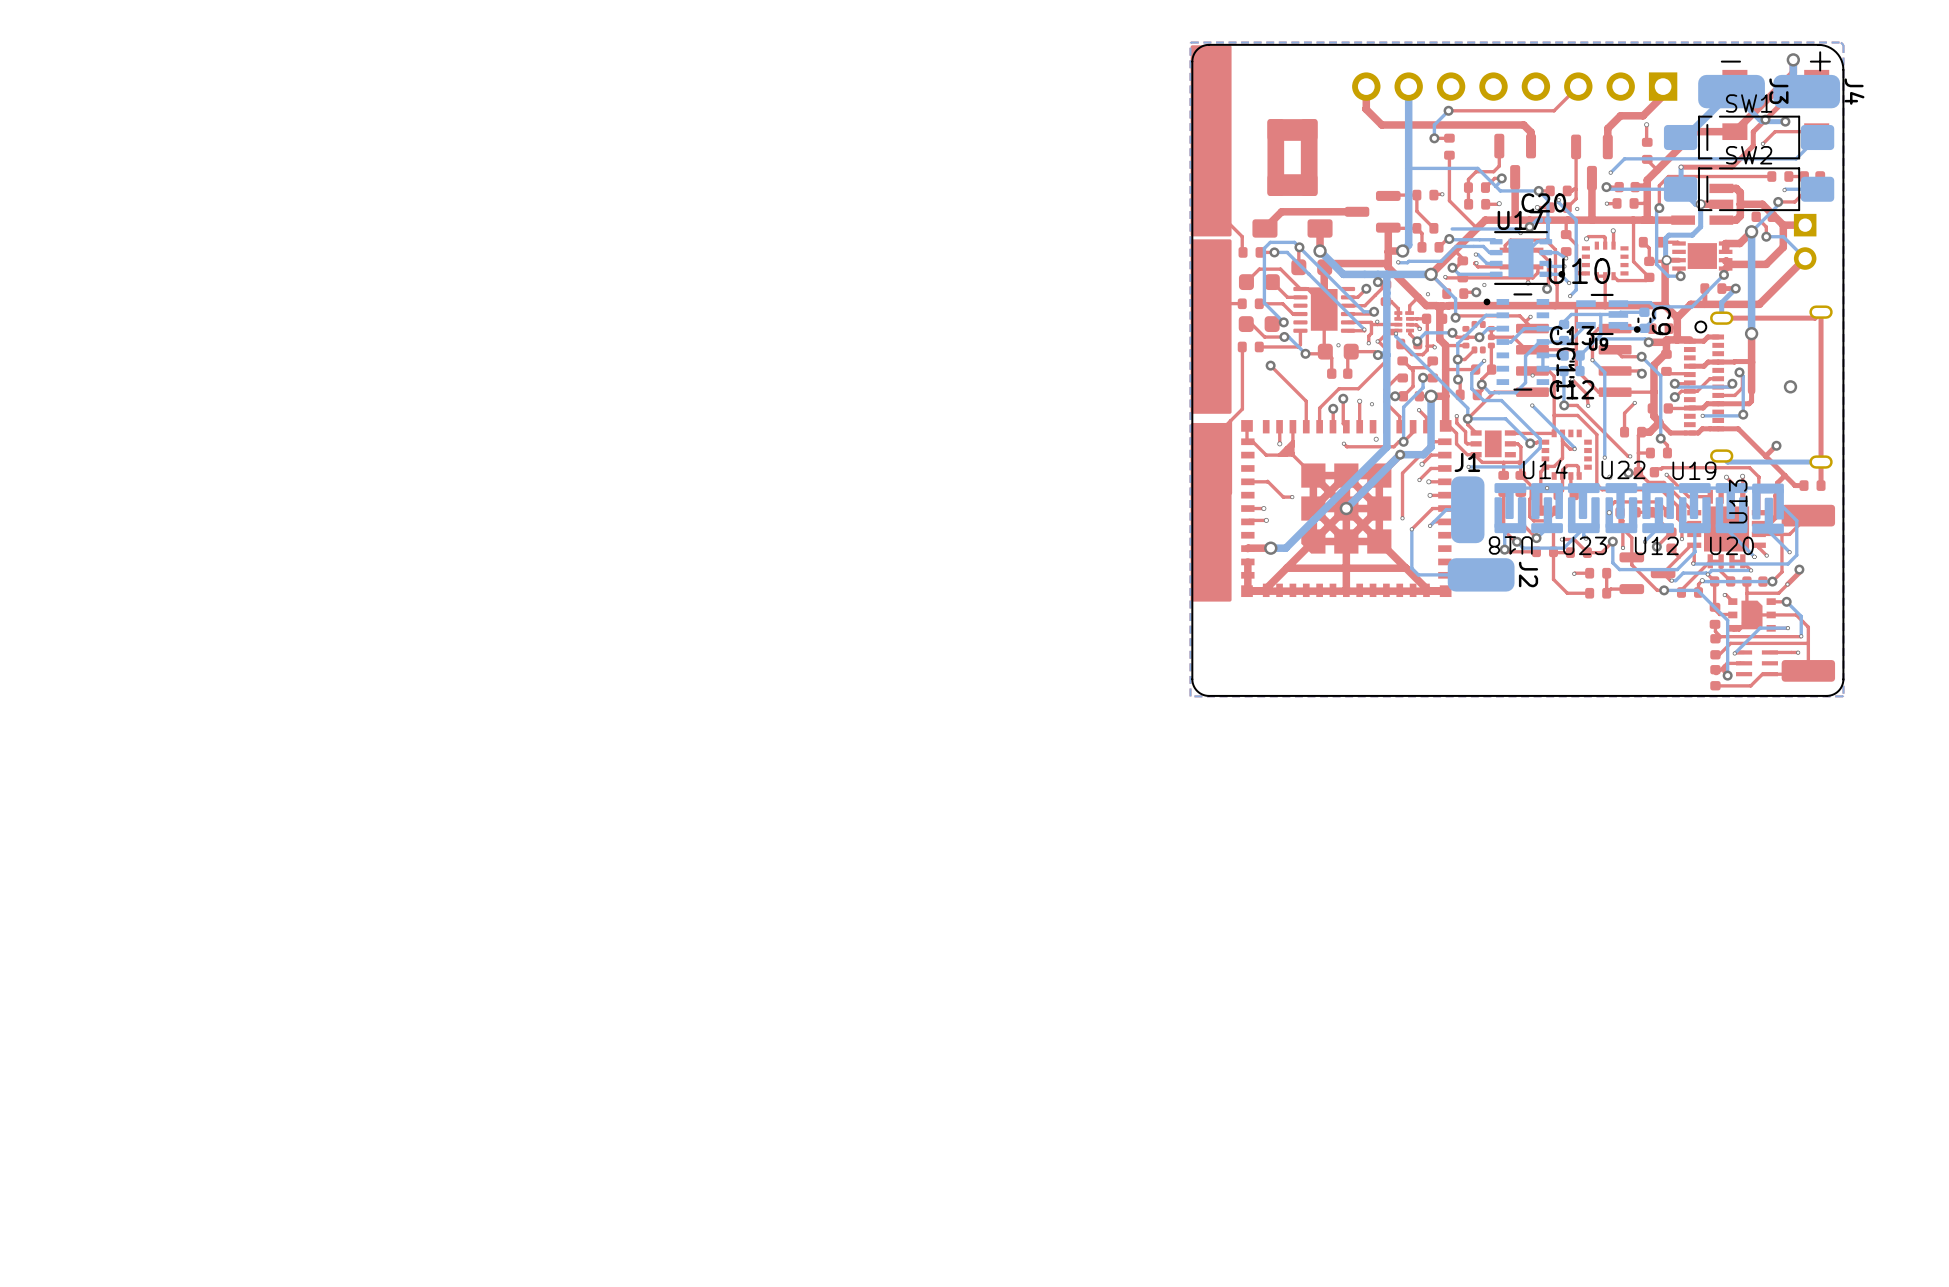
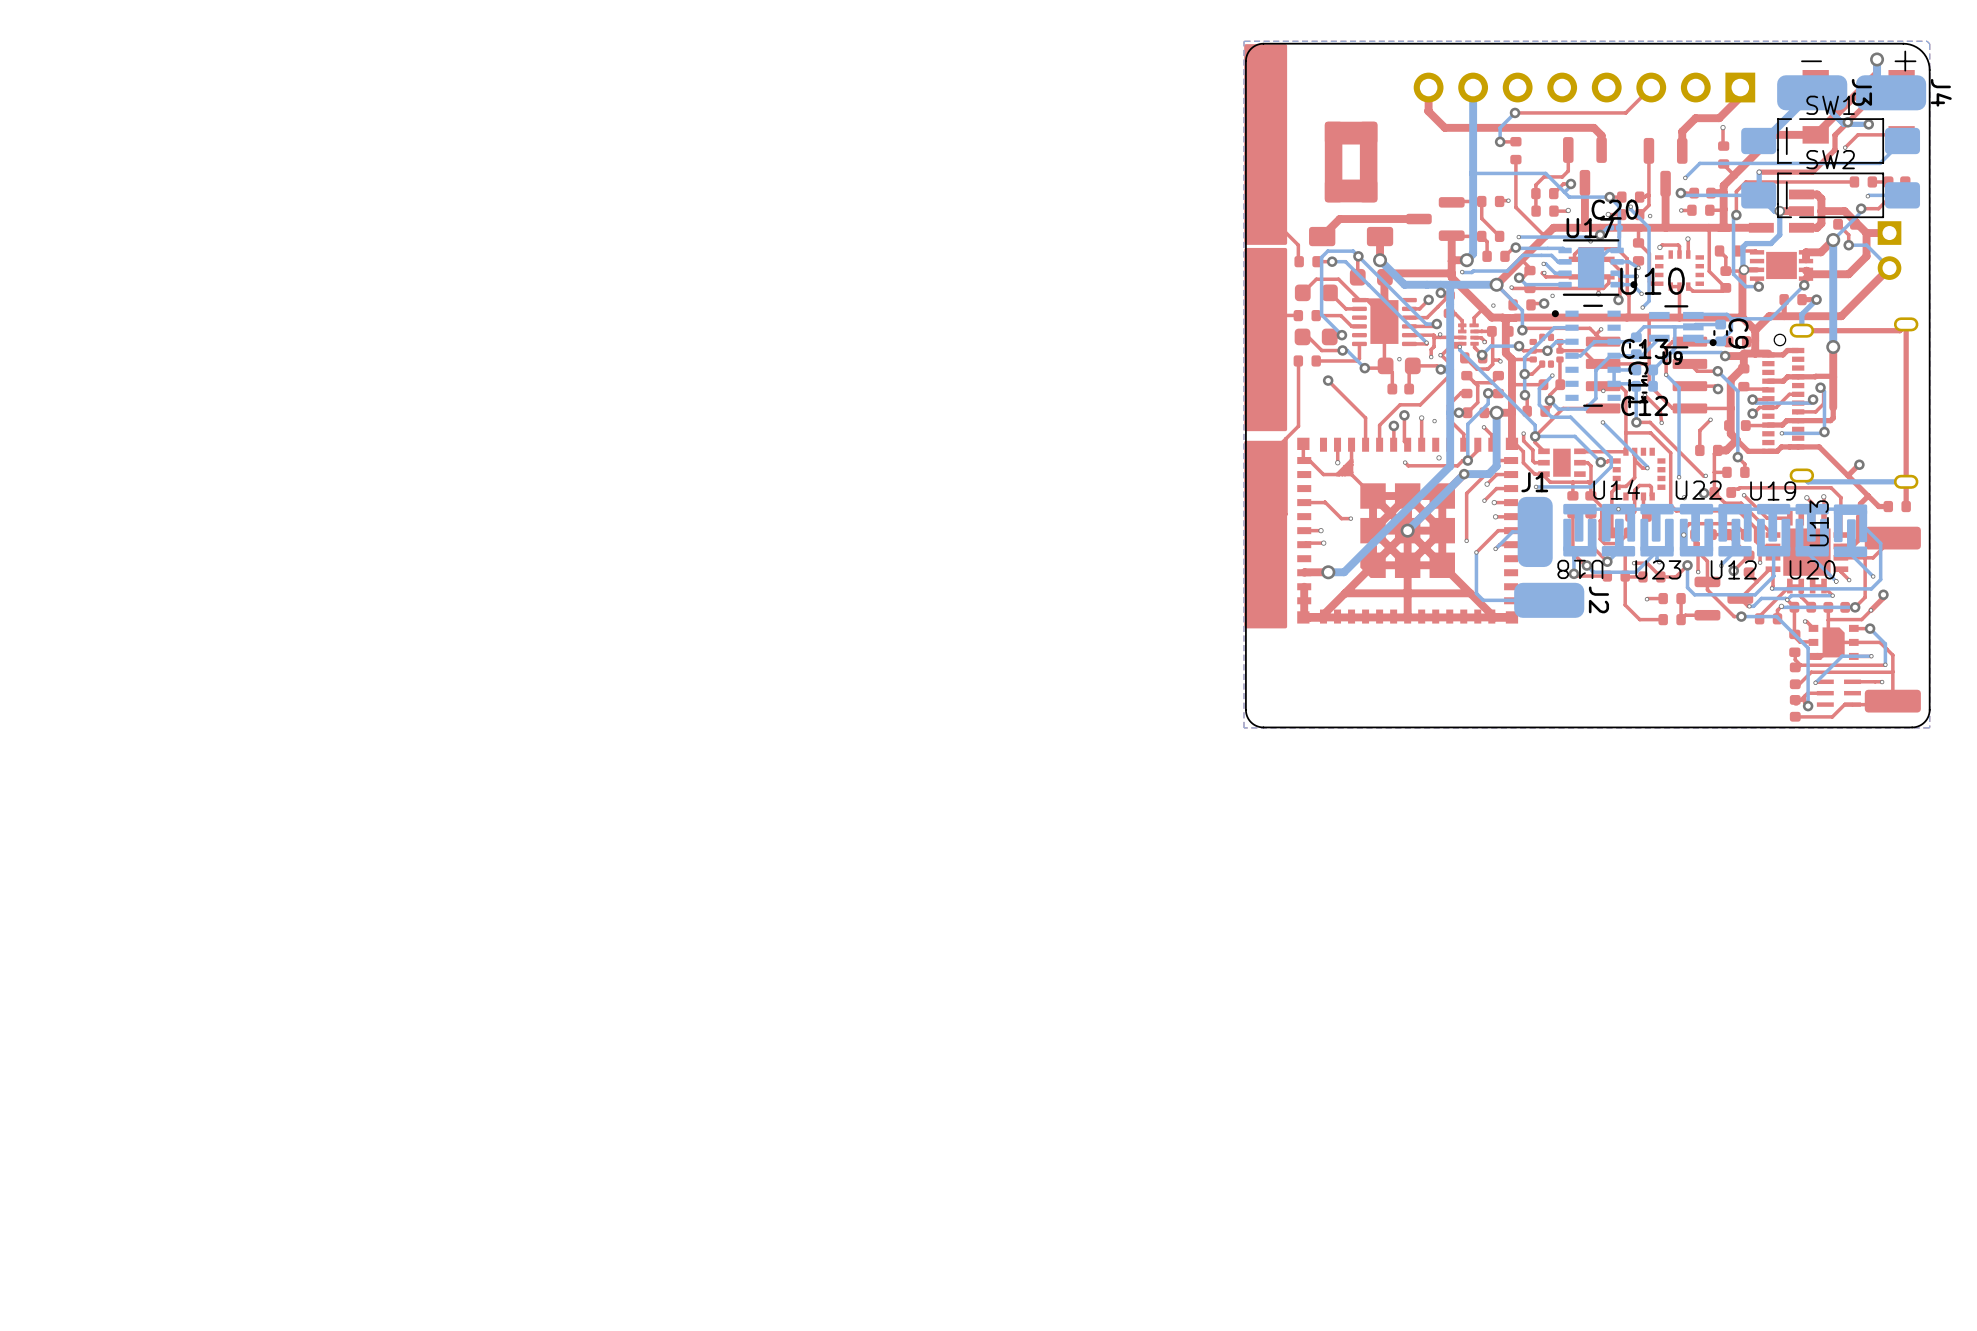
via: none -> (1518, 237)
via: (1790, 386) -> none

